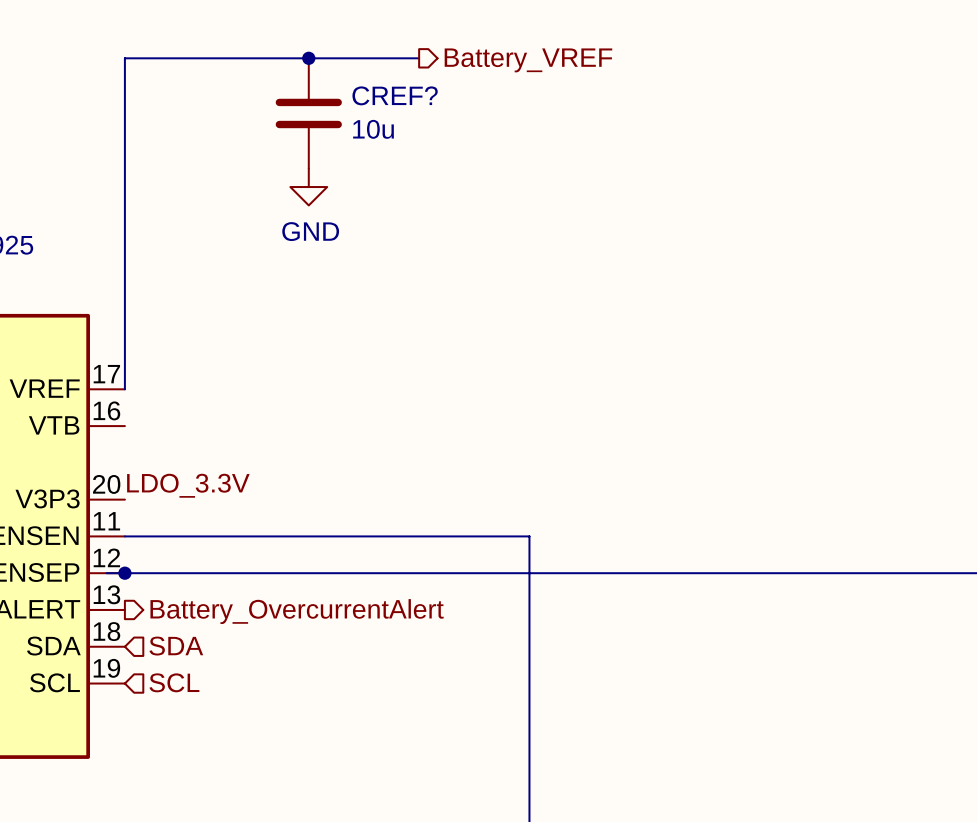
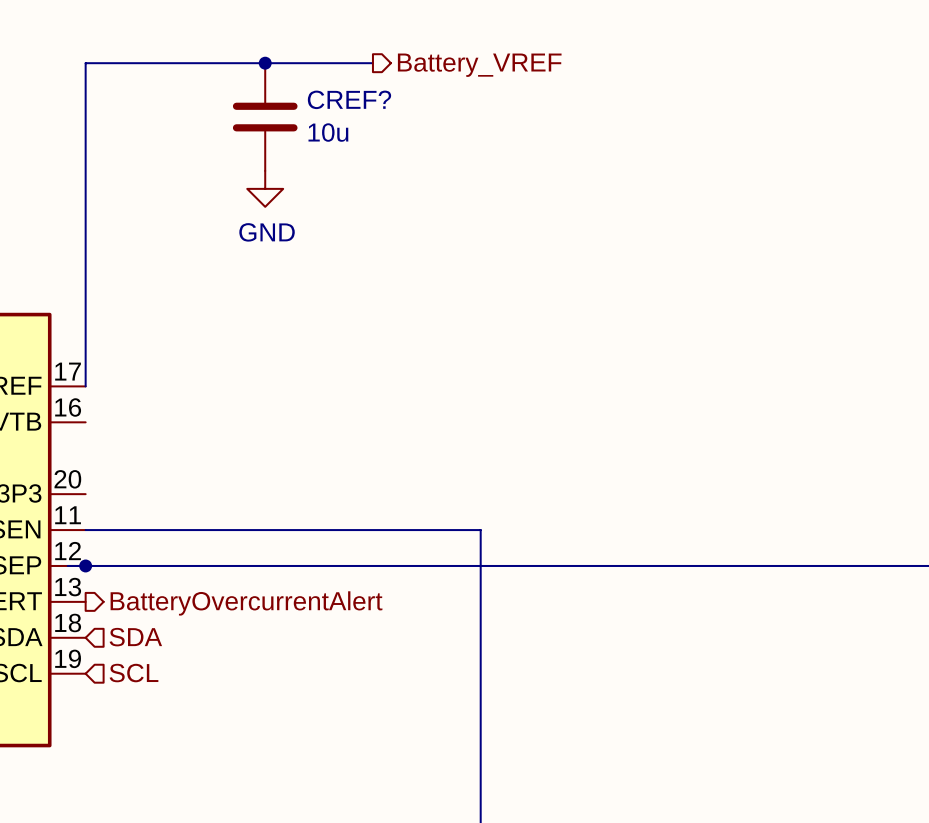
label: LDO_3.3V (188, 485) -> none
hierarchical label: Battery_OvercurrentAlert (297, 611) -> BatteryOvercurrentAlert (246, 603)

